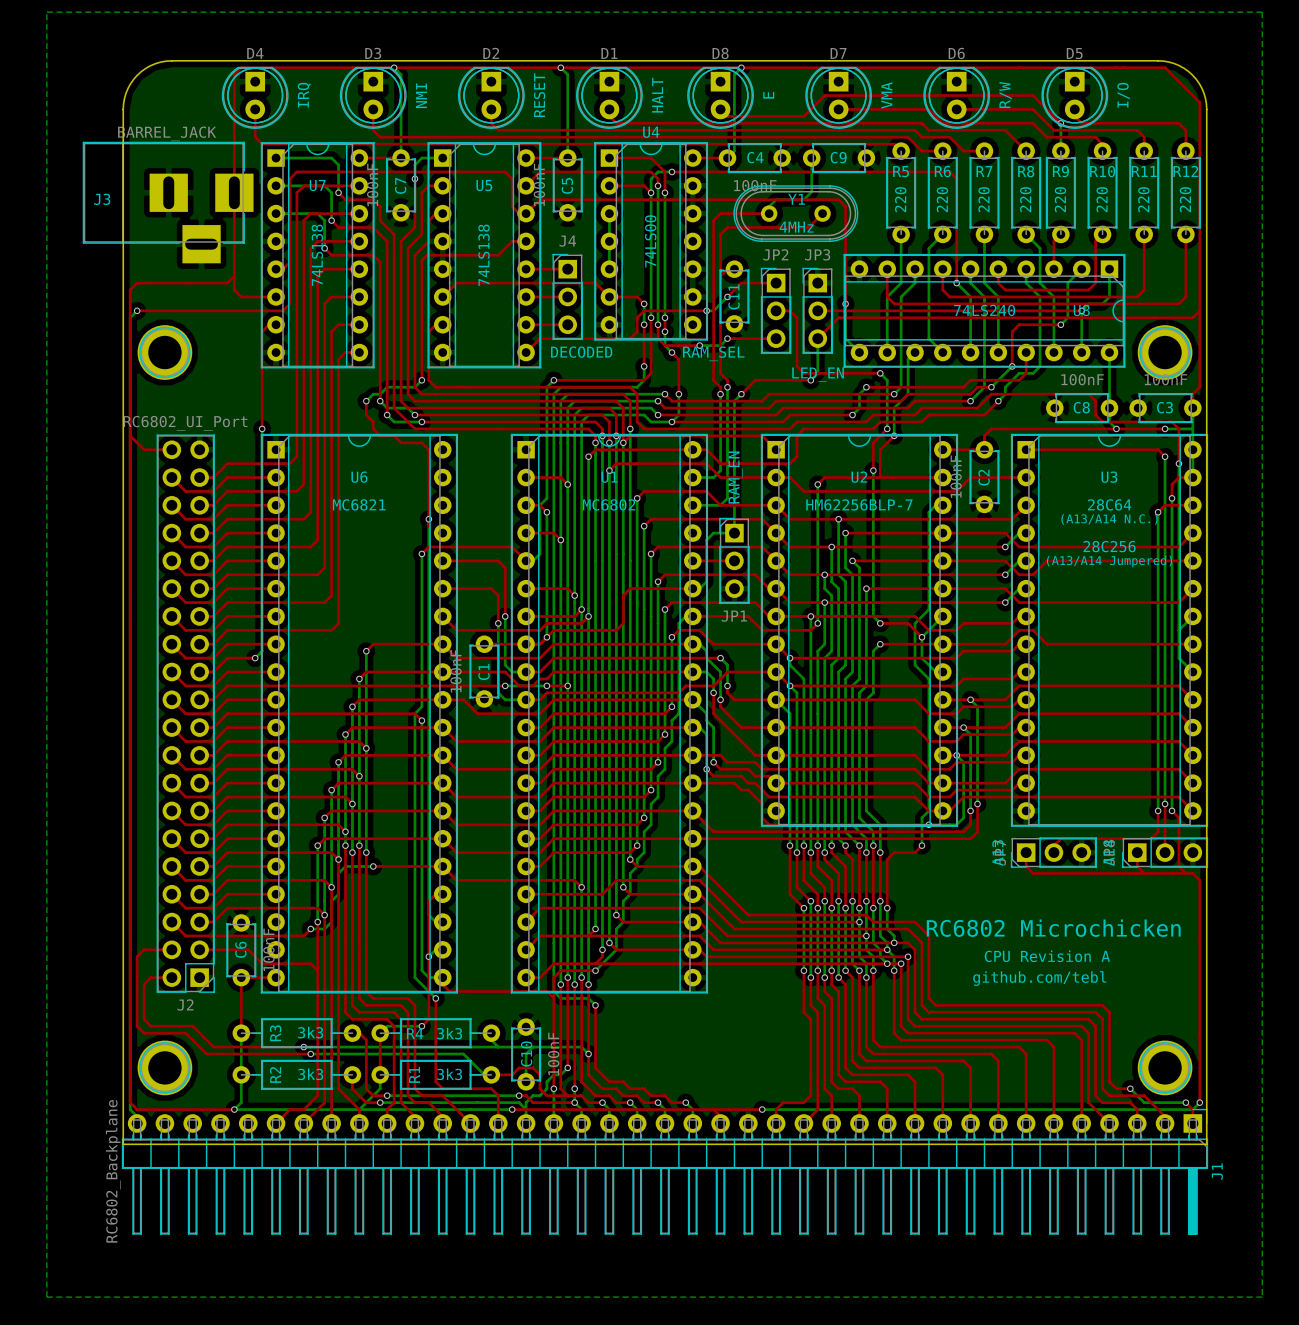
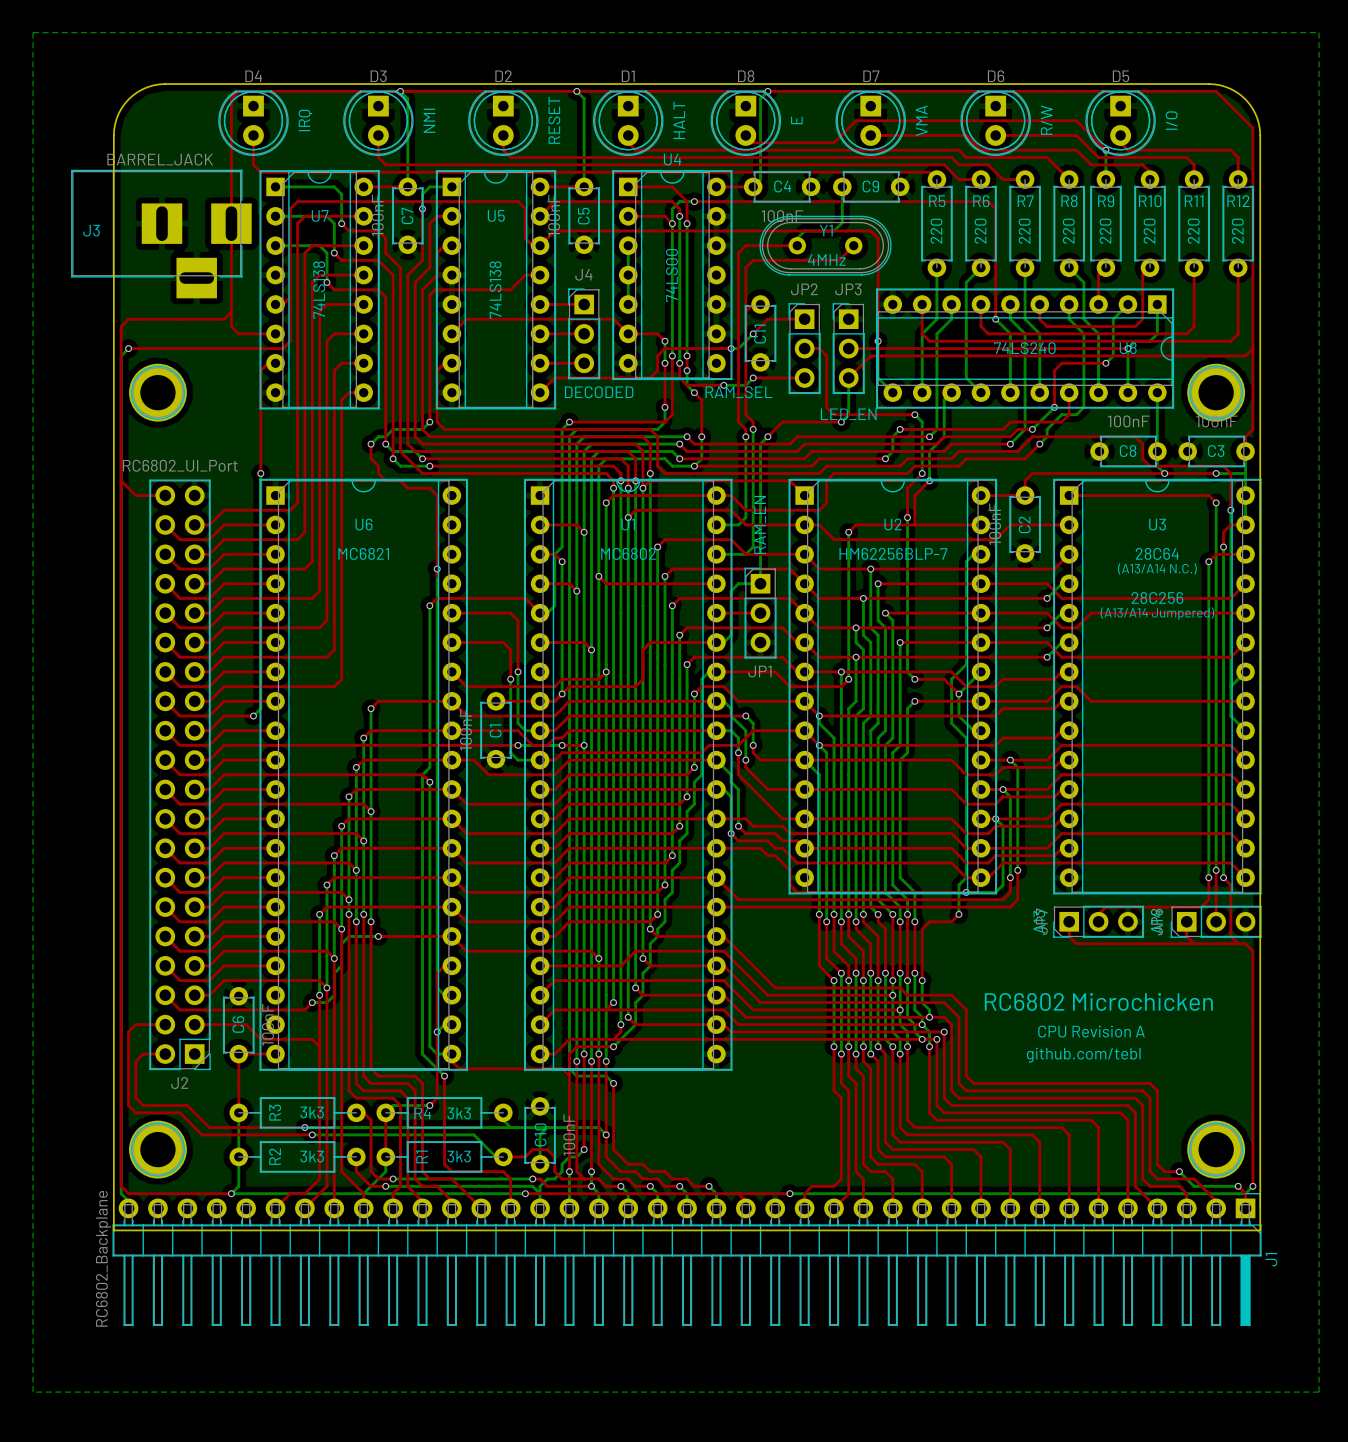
top track: none -> (598, 576) (606, 583) (716, 583)
via: none -> (598, 576)
top track: (581, 609) (574, 616) (526, 616) -> none
via: (581, 609) -> none

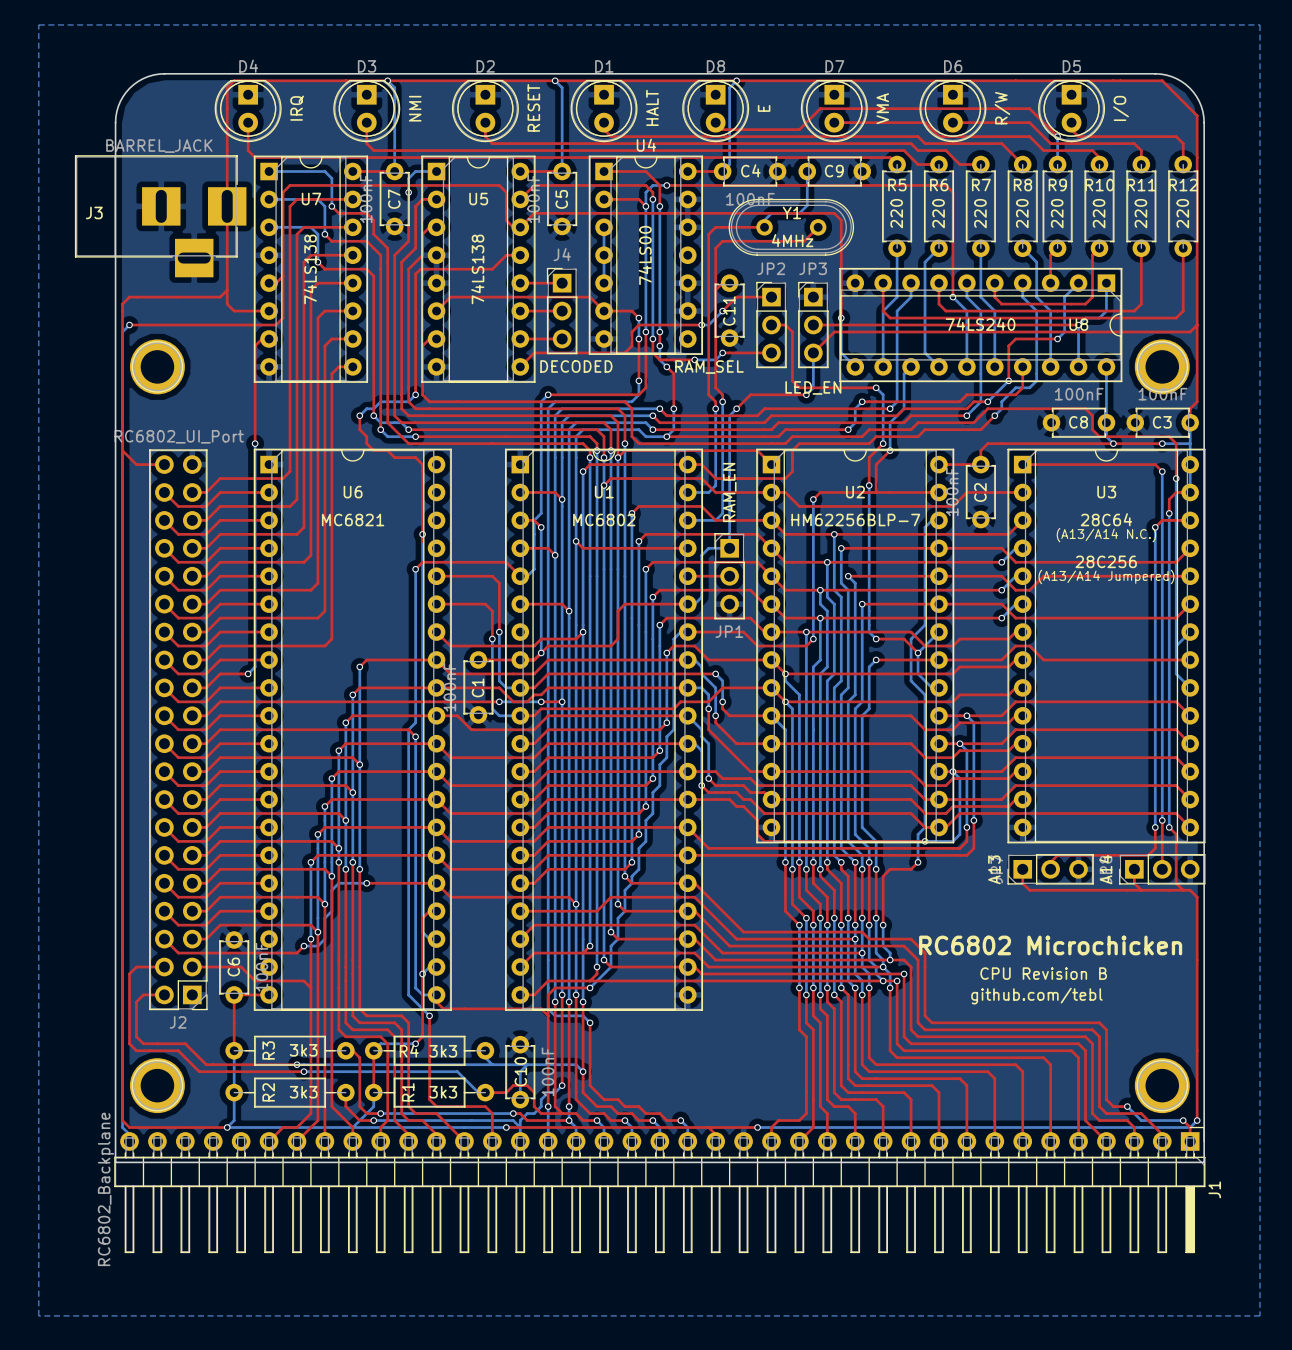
text: CPU Revision A (1091, 1031) -> CPU Revision B (1043, 973)

